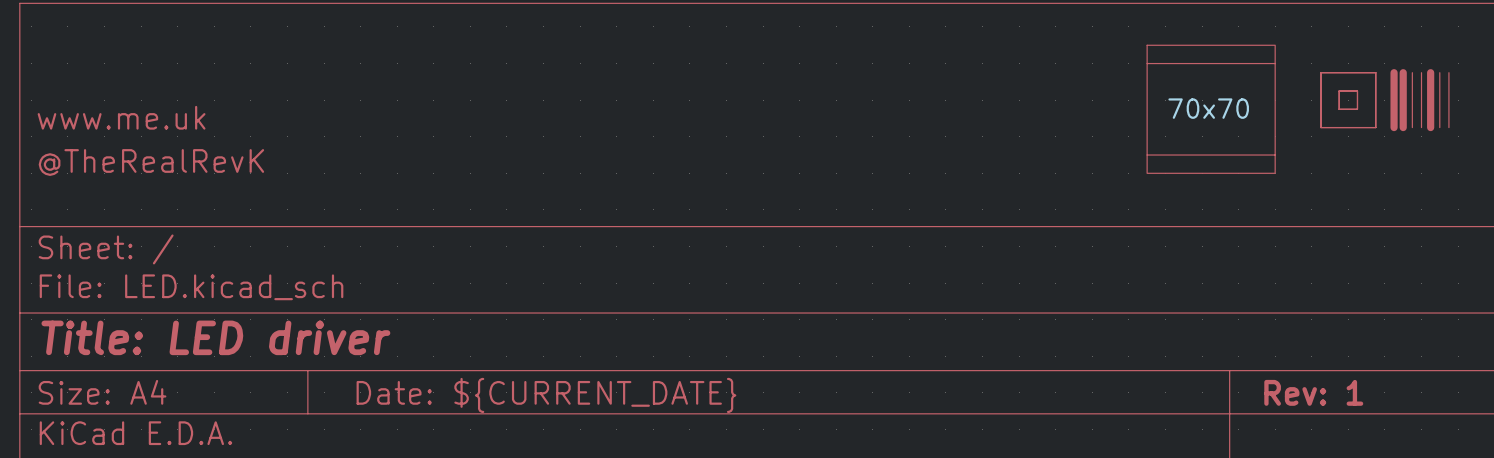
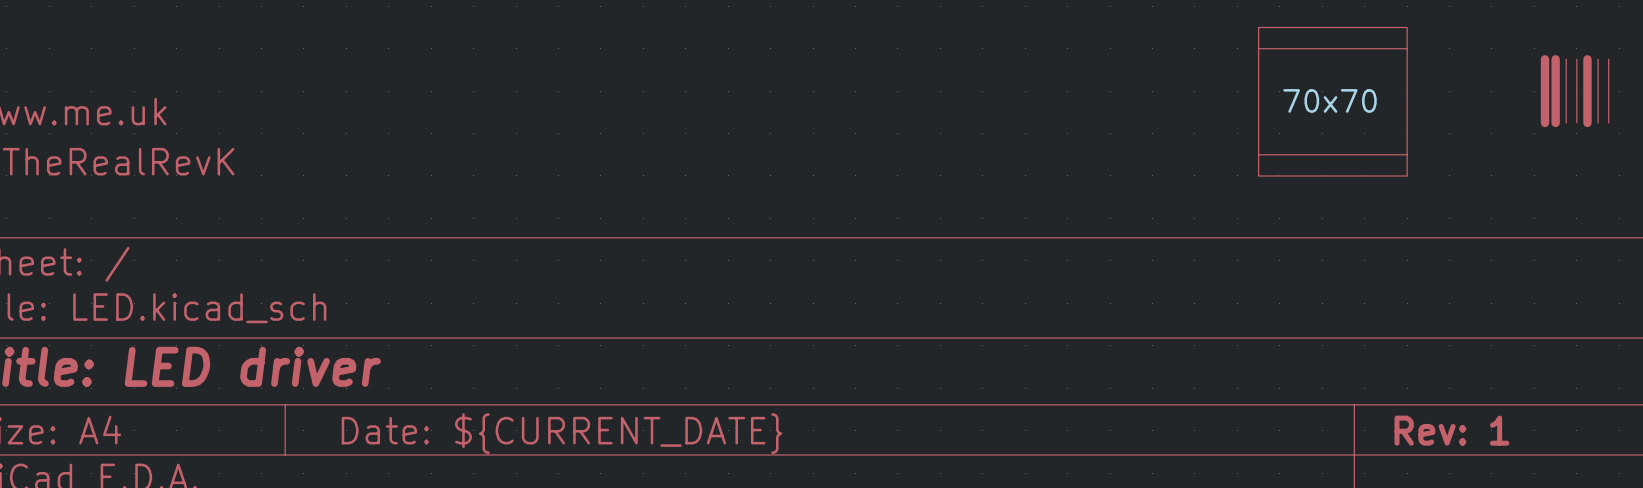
part: (1348, 100) -> none

